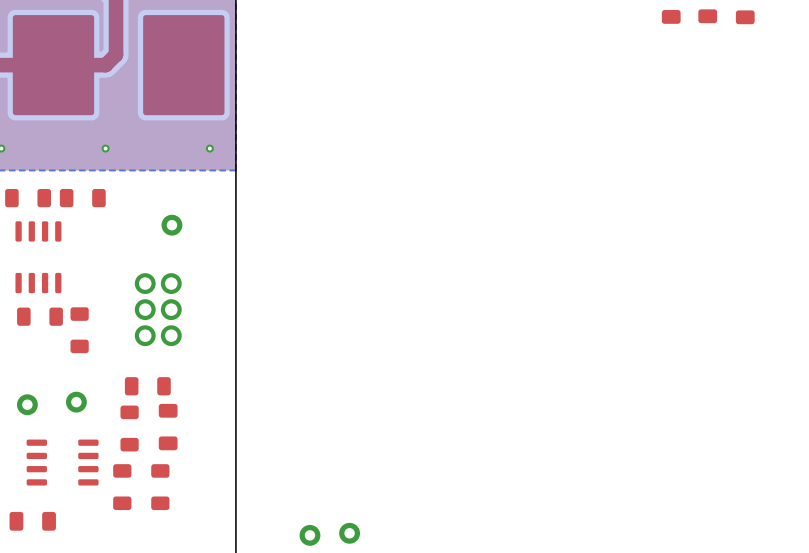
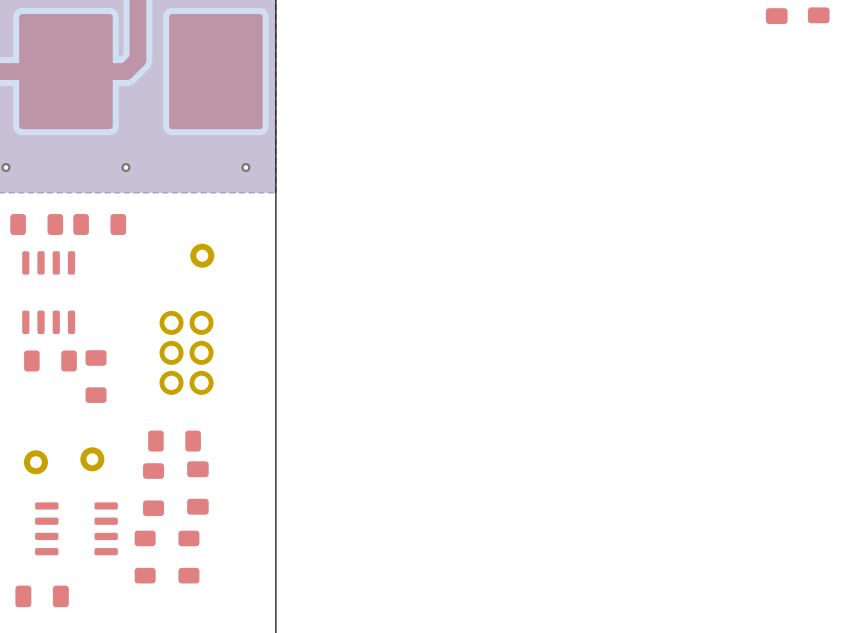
part: (349, 533) -> none
part: (309, 535) -> none

